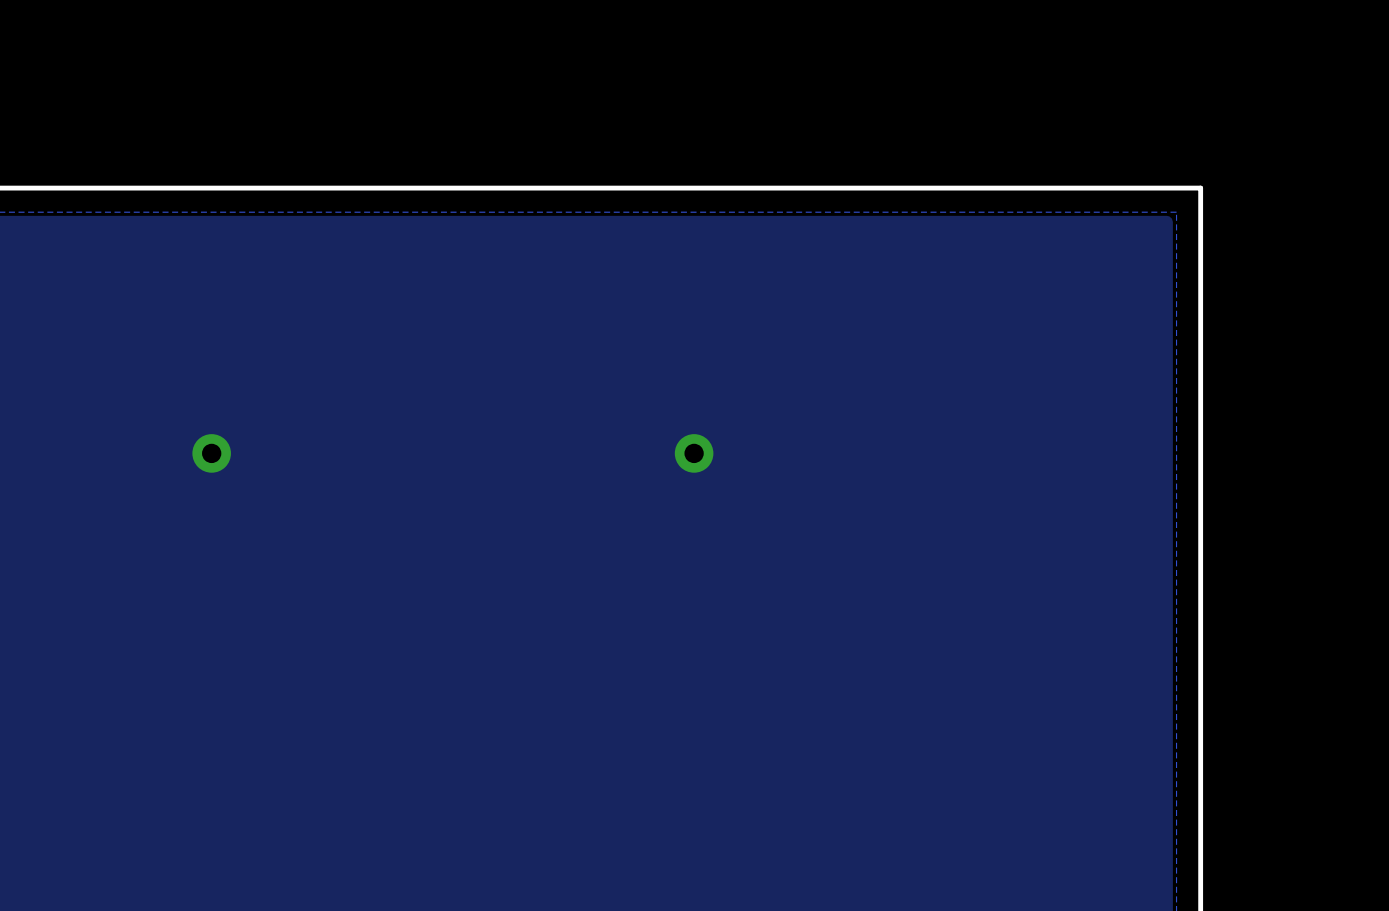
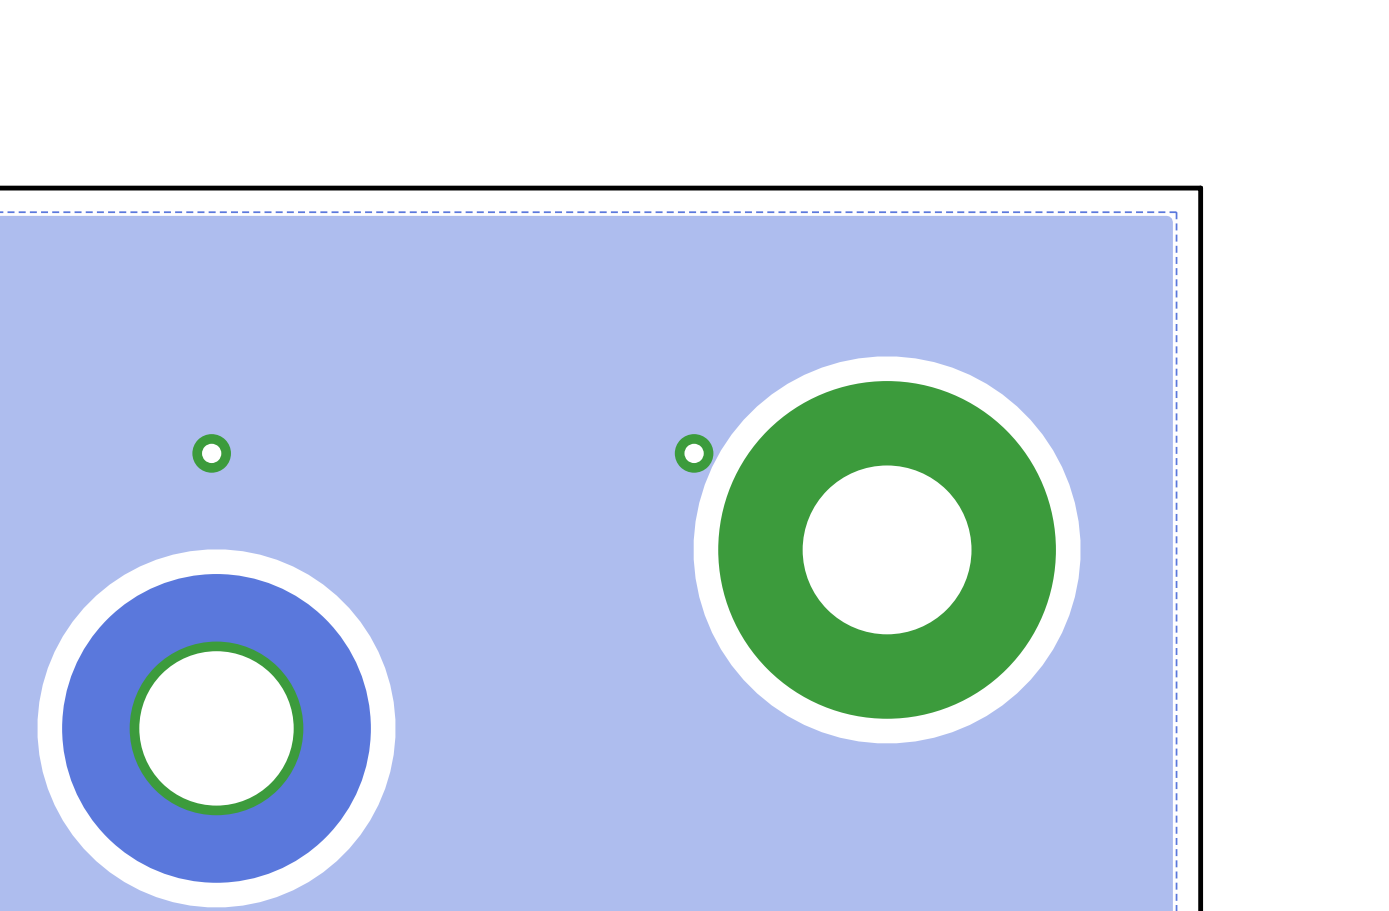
part: none -> (887, 549)
part: none -> (216, 728)

